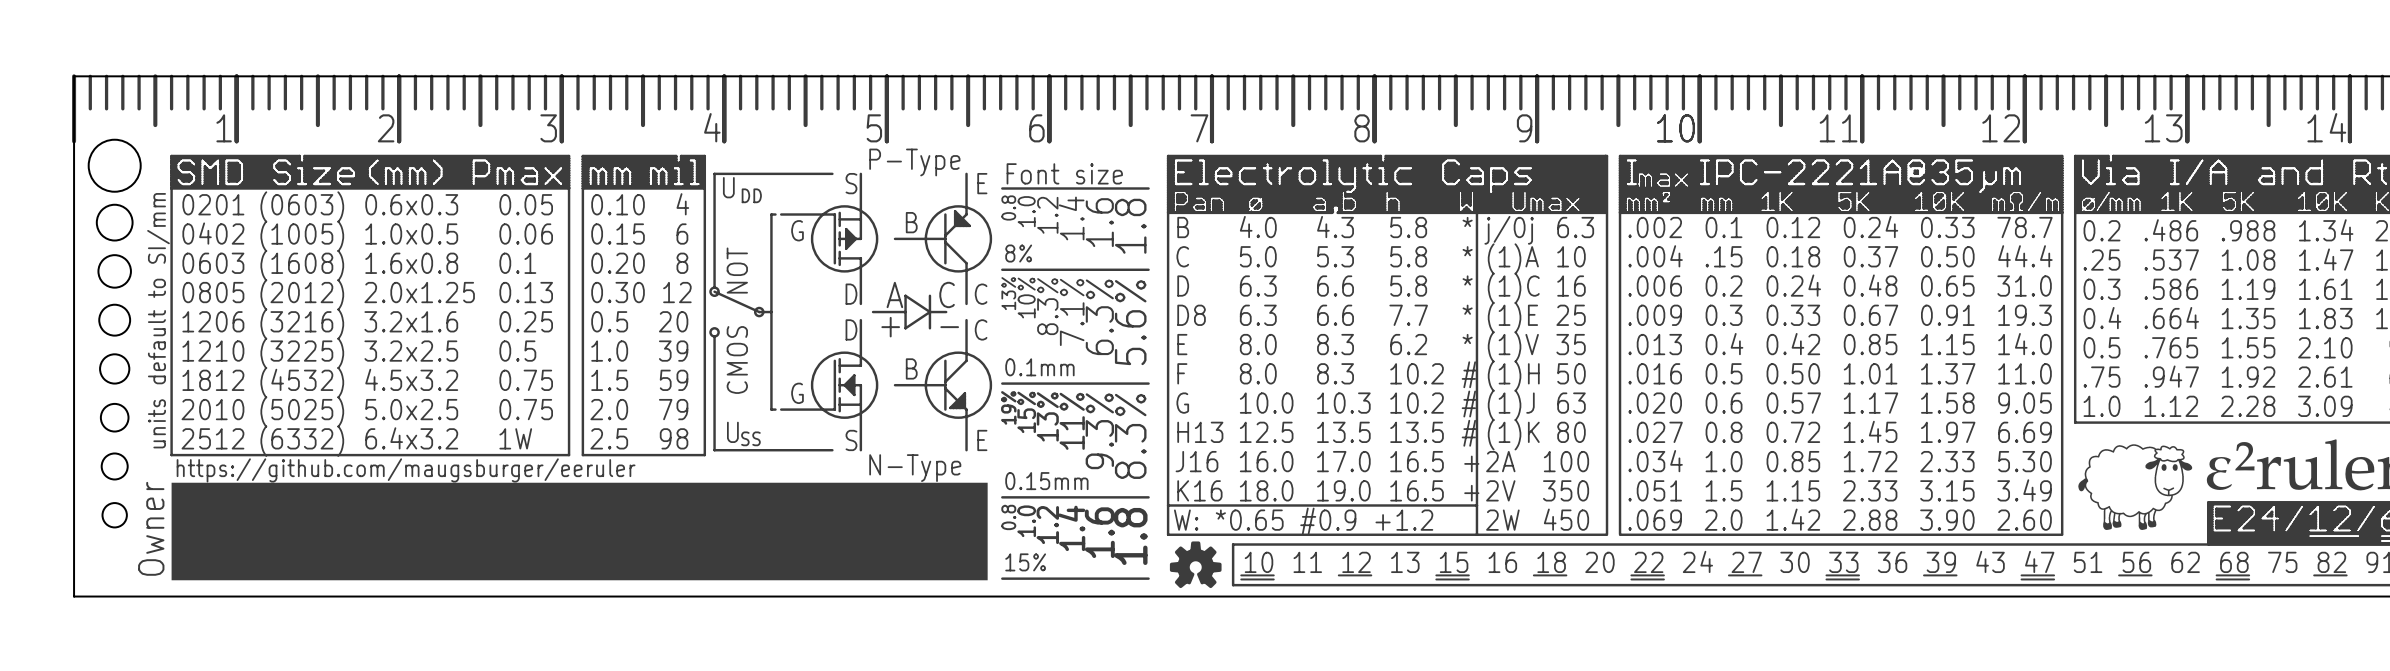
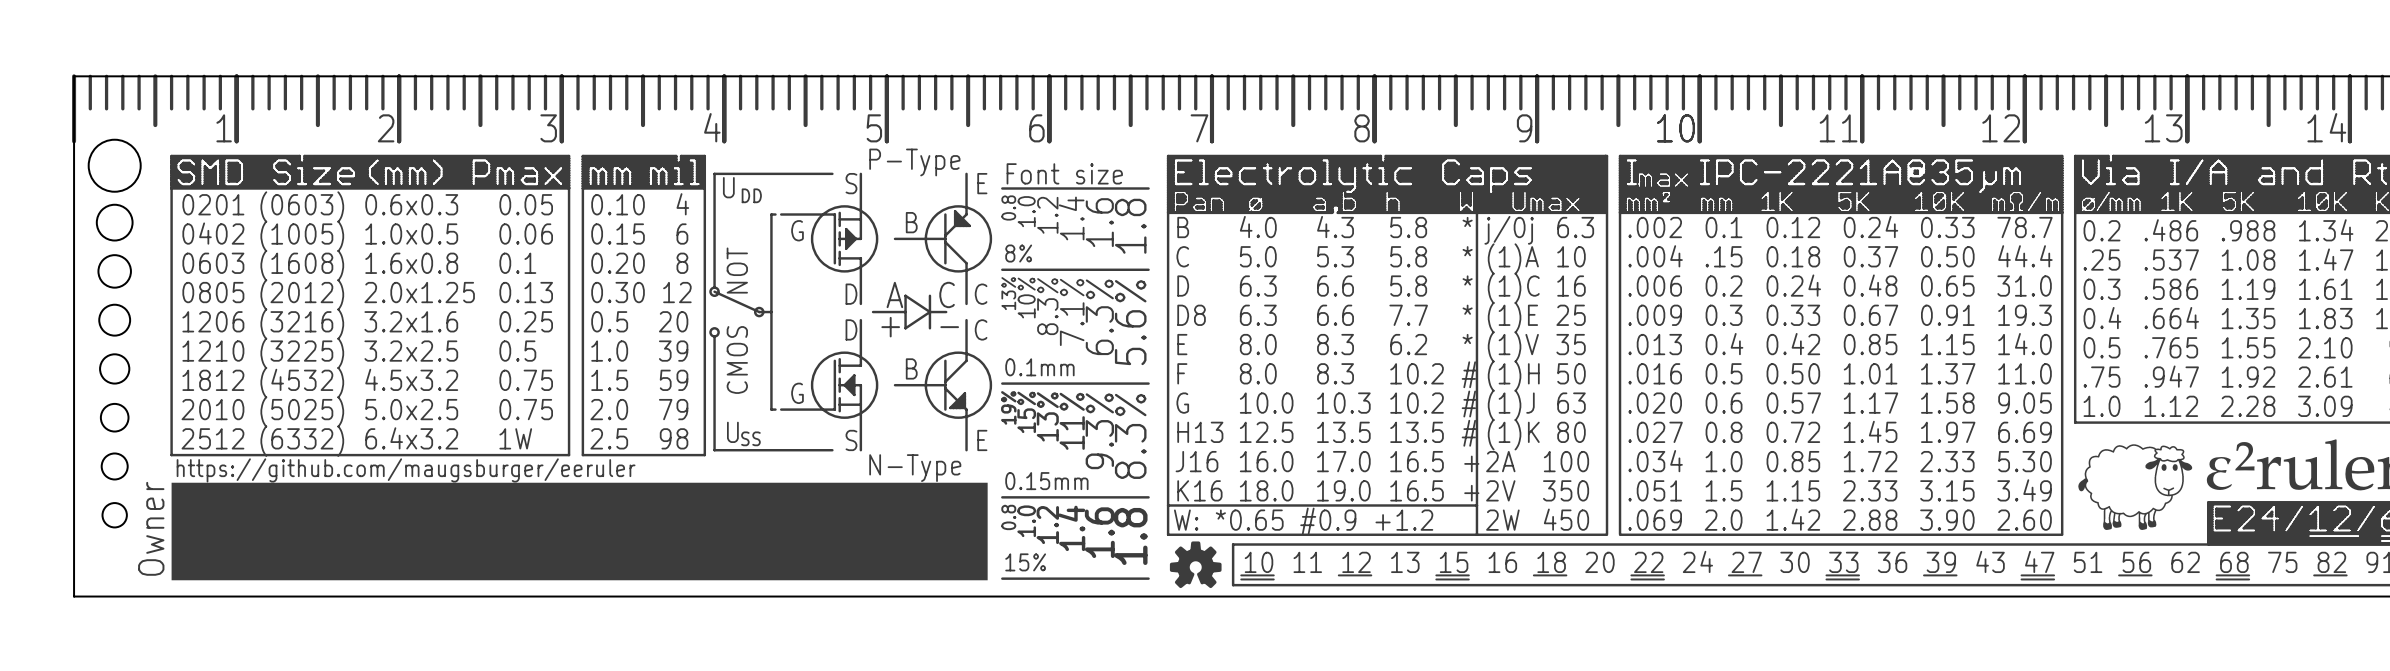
text: units default to SI/mm (158, 320) -> none

